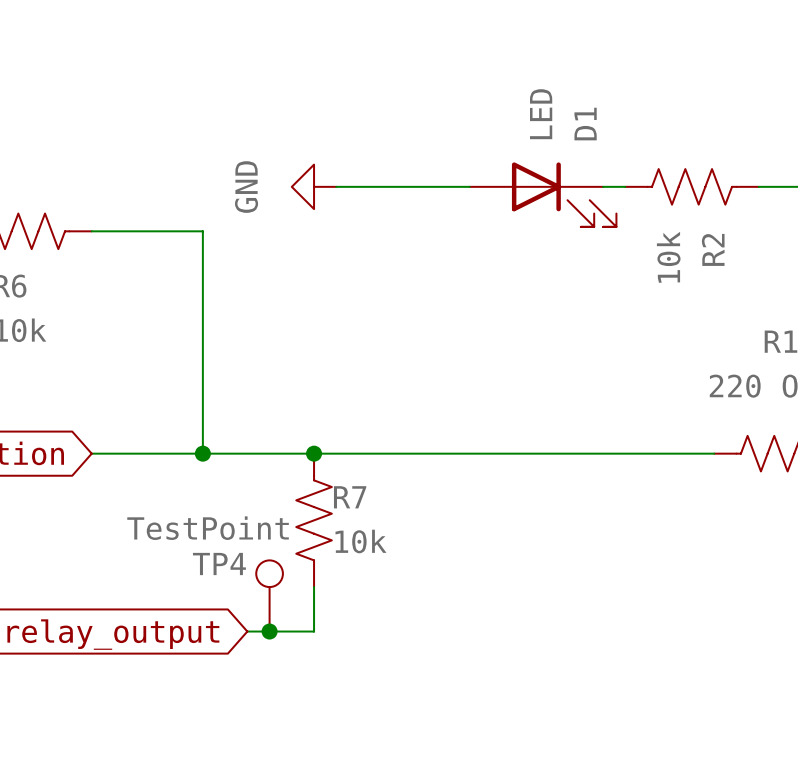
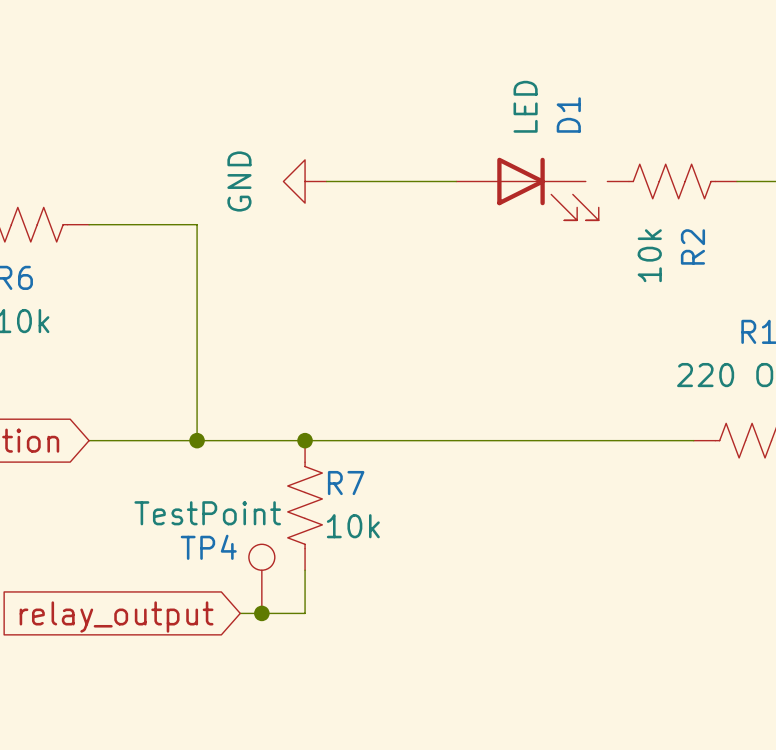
wire: (603, 186) (625, 186) -> none

